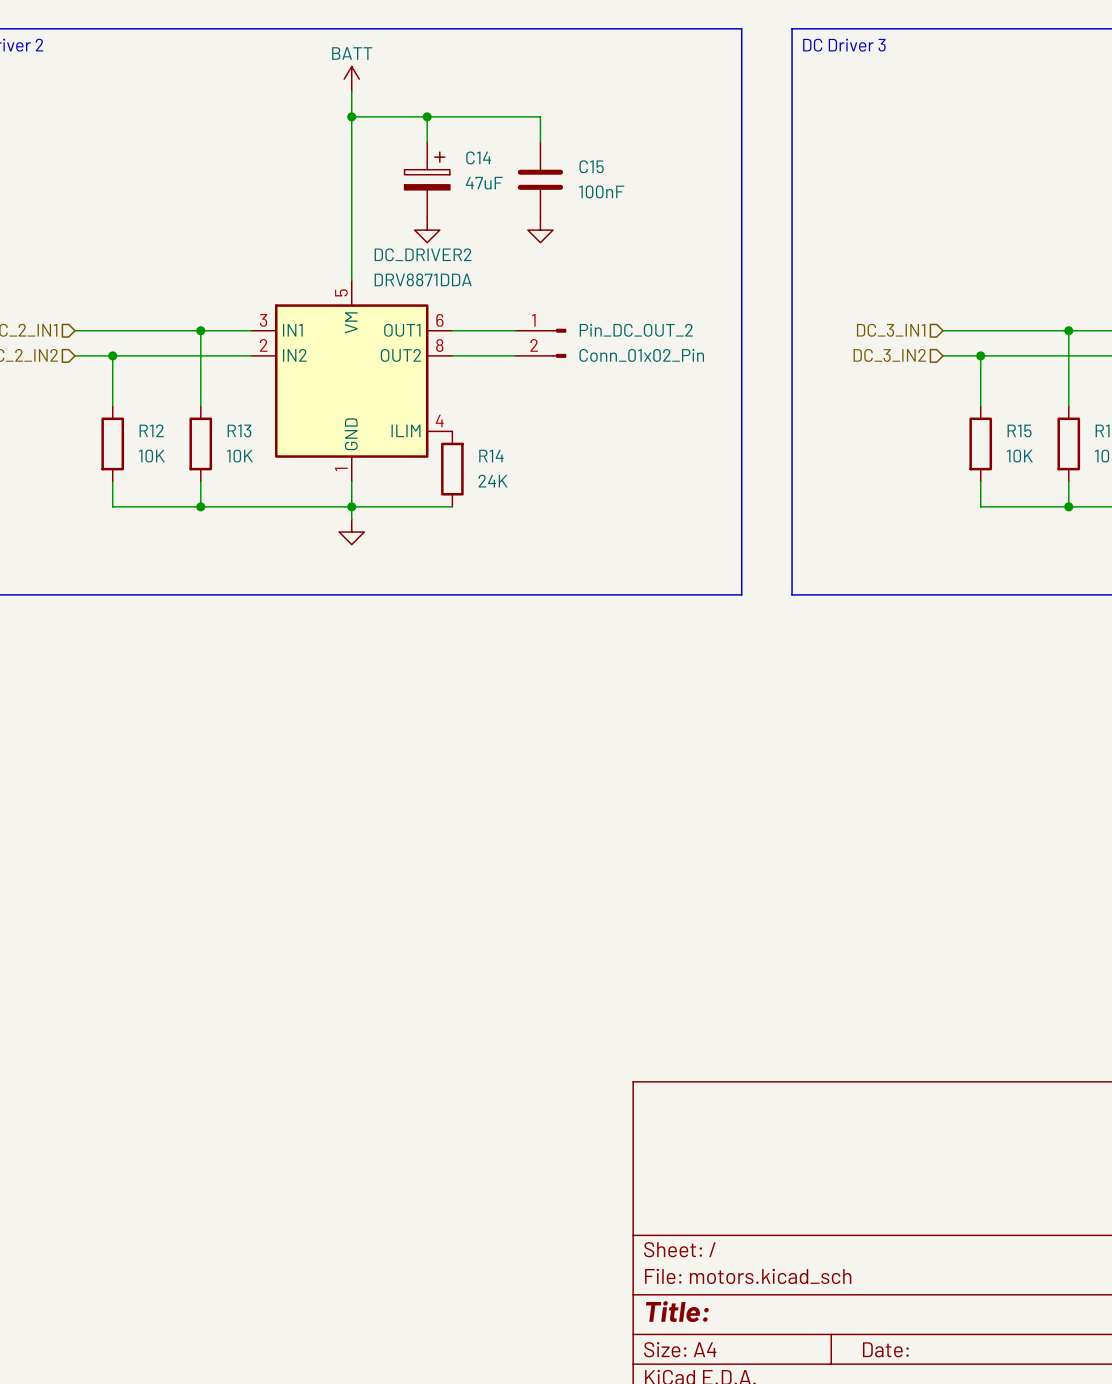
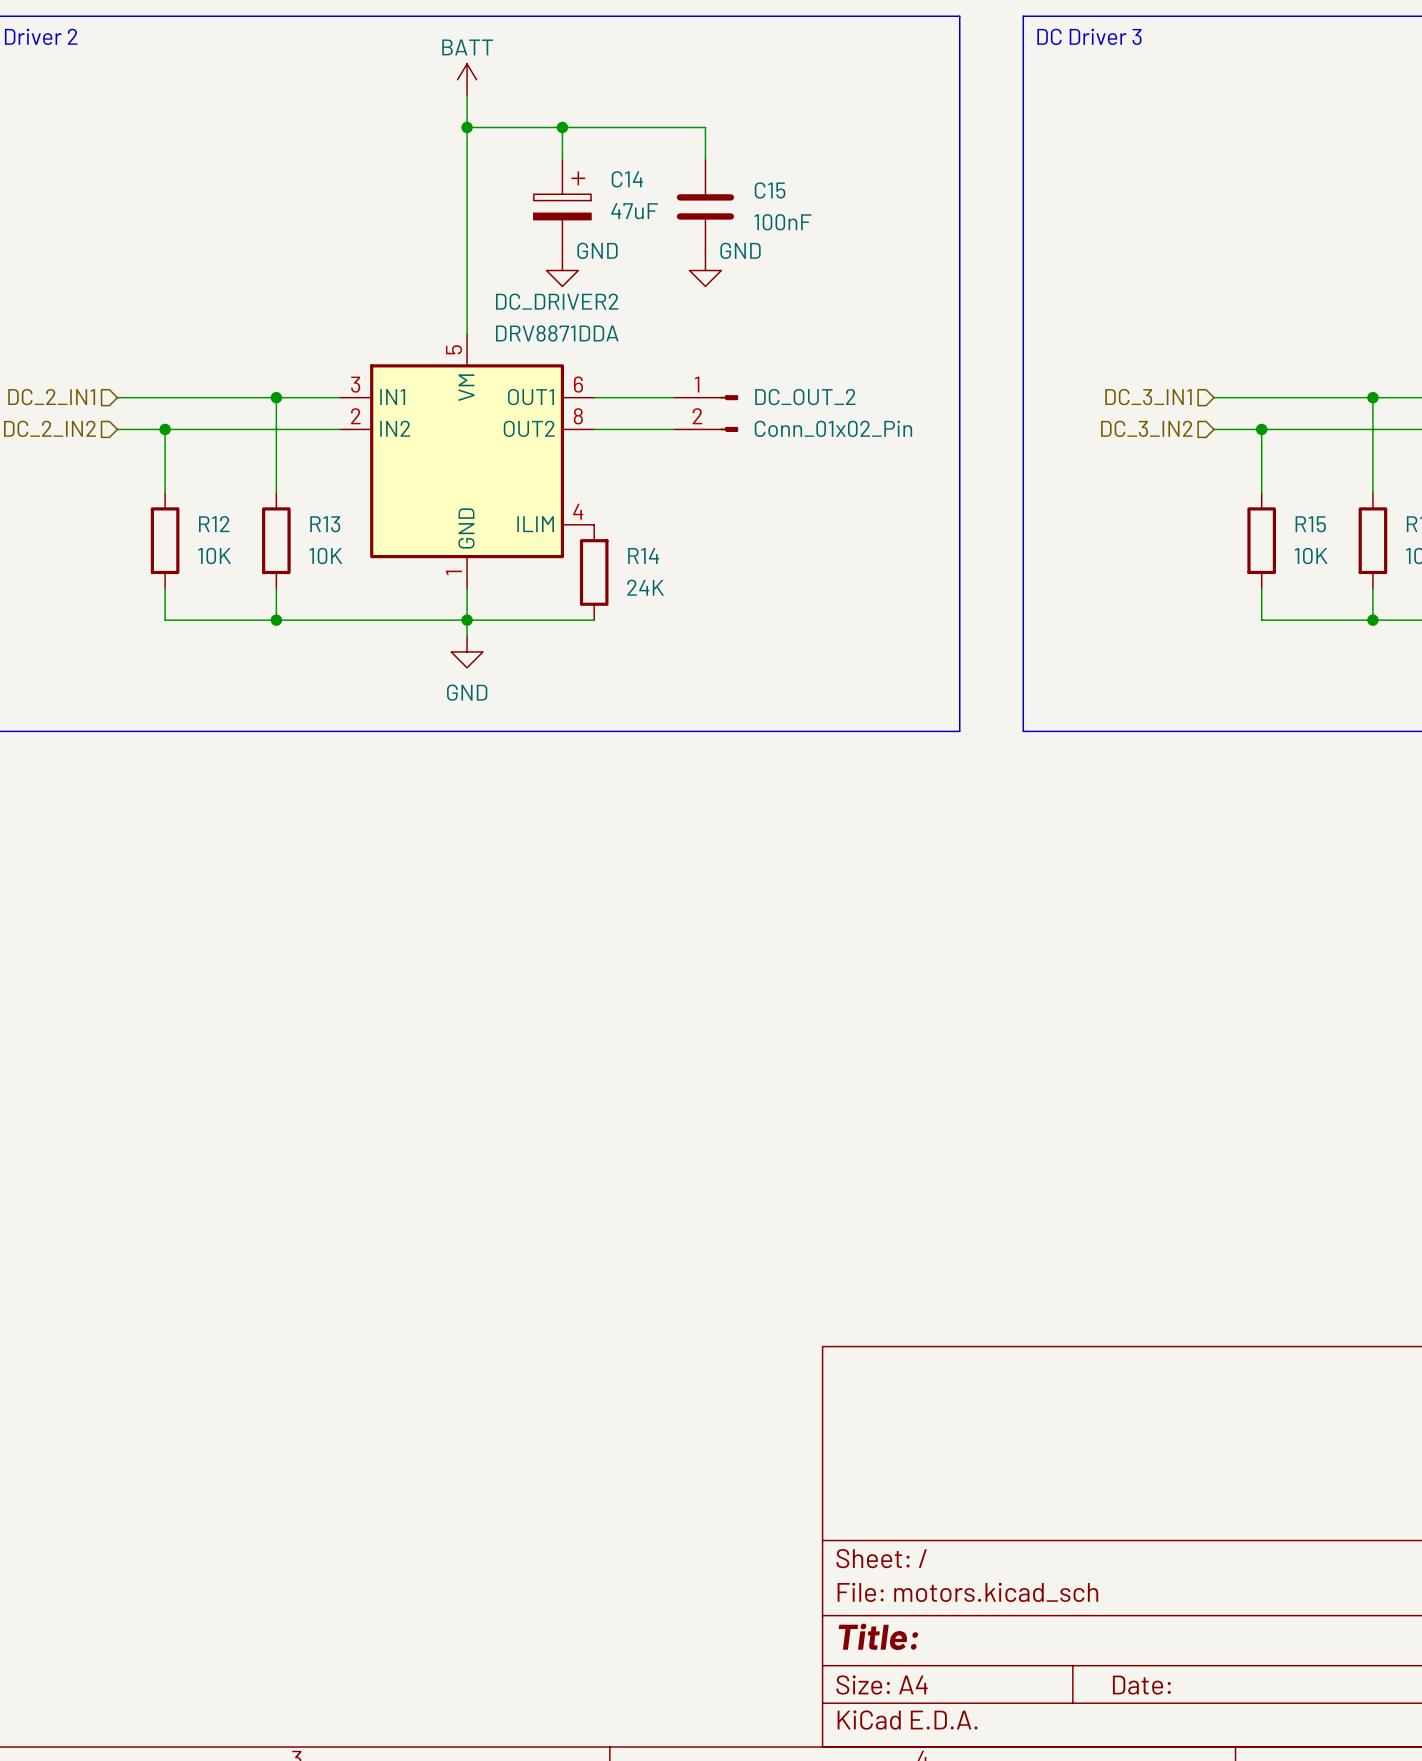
power symbol text: none -> GND (597, 250)
power symbol text: none -> GND (740, 250)
Pin_DC_OUT_2 name: Pin_DC_OUT_2 (636, 330) -> DC_OUT_2 (805, 397)
power symbol text: none -> GND (467, 692)

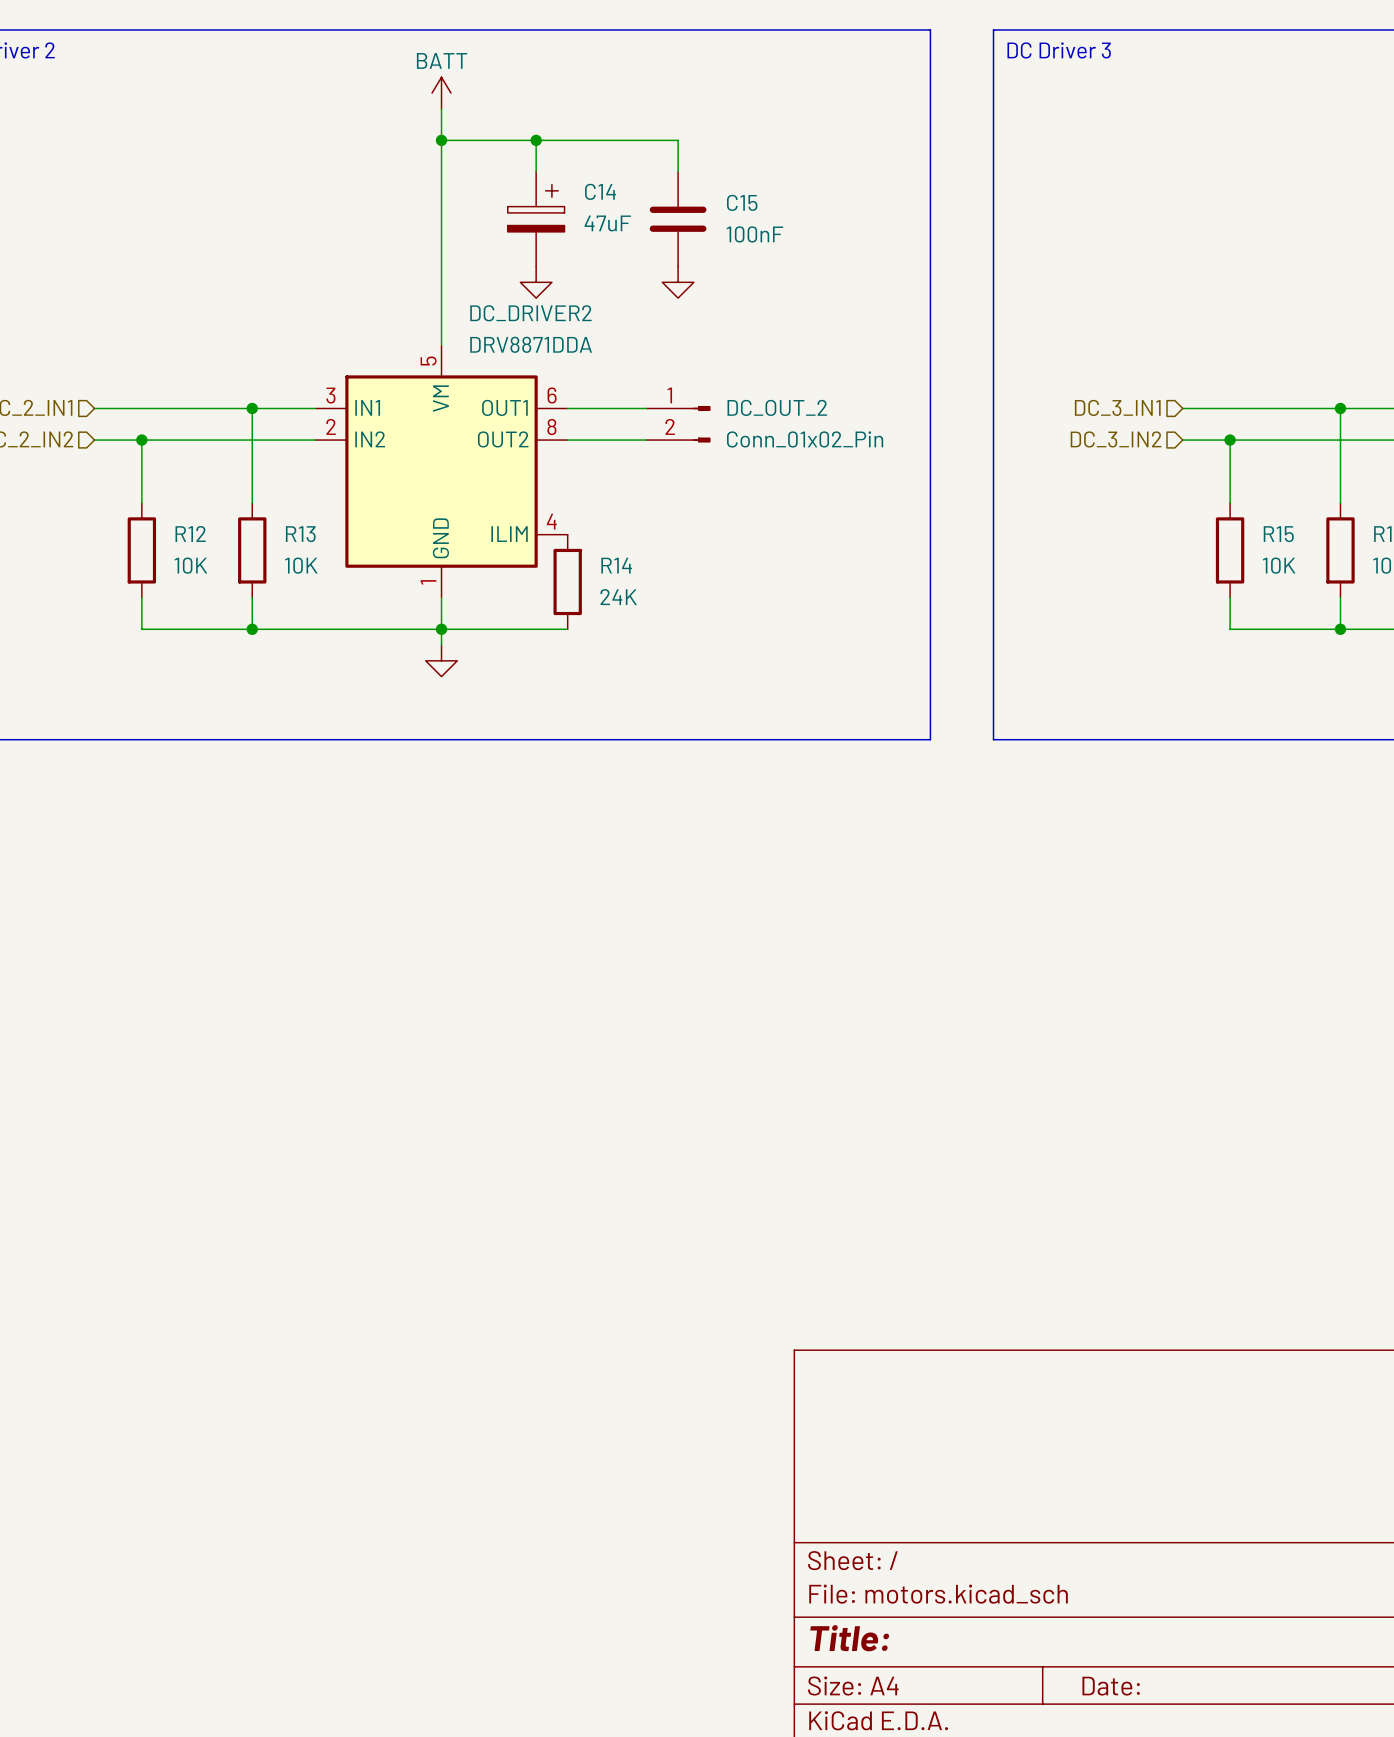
power symbol text: GND (597, 250) -> none
power symbol text: GND (740, 250) -> none
power symbol text: GND (467, 692) -> none

